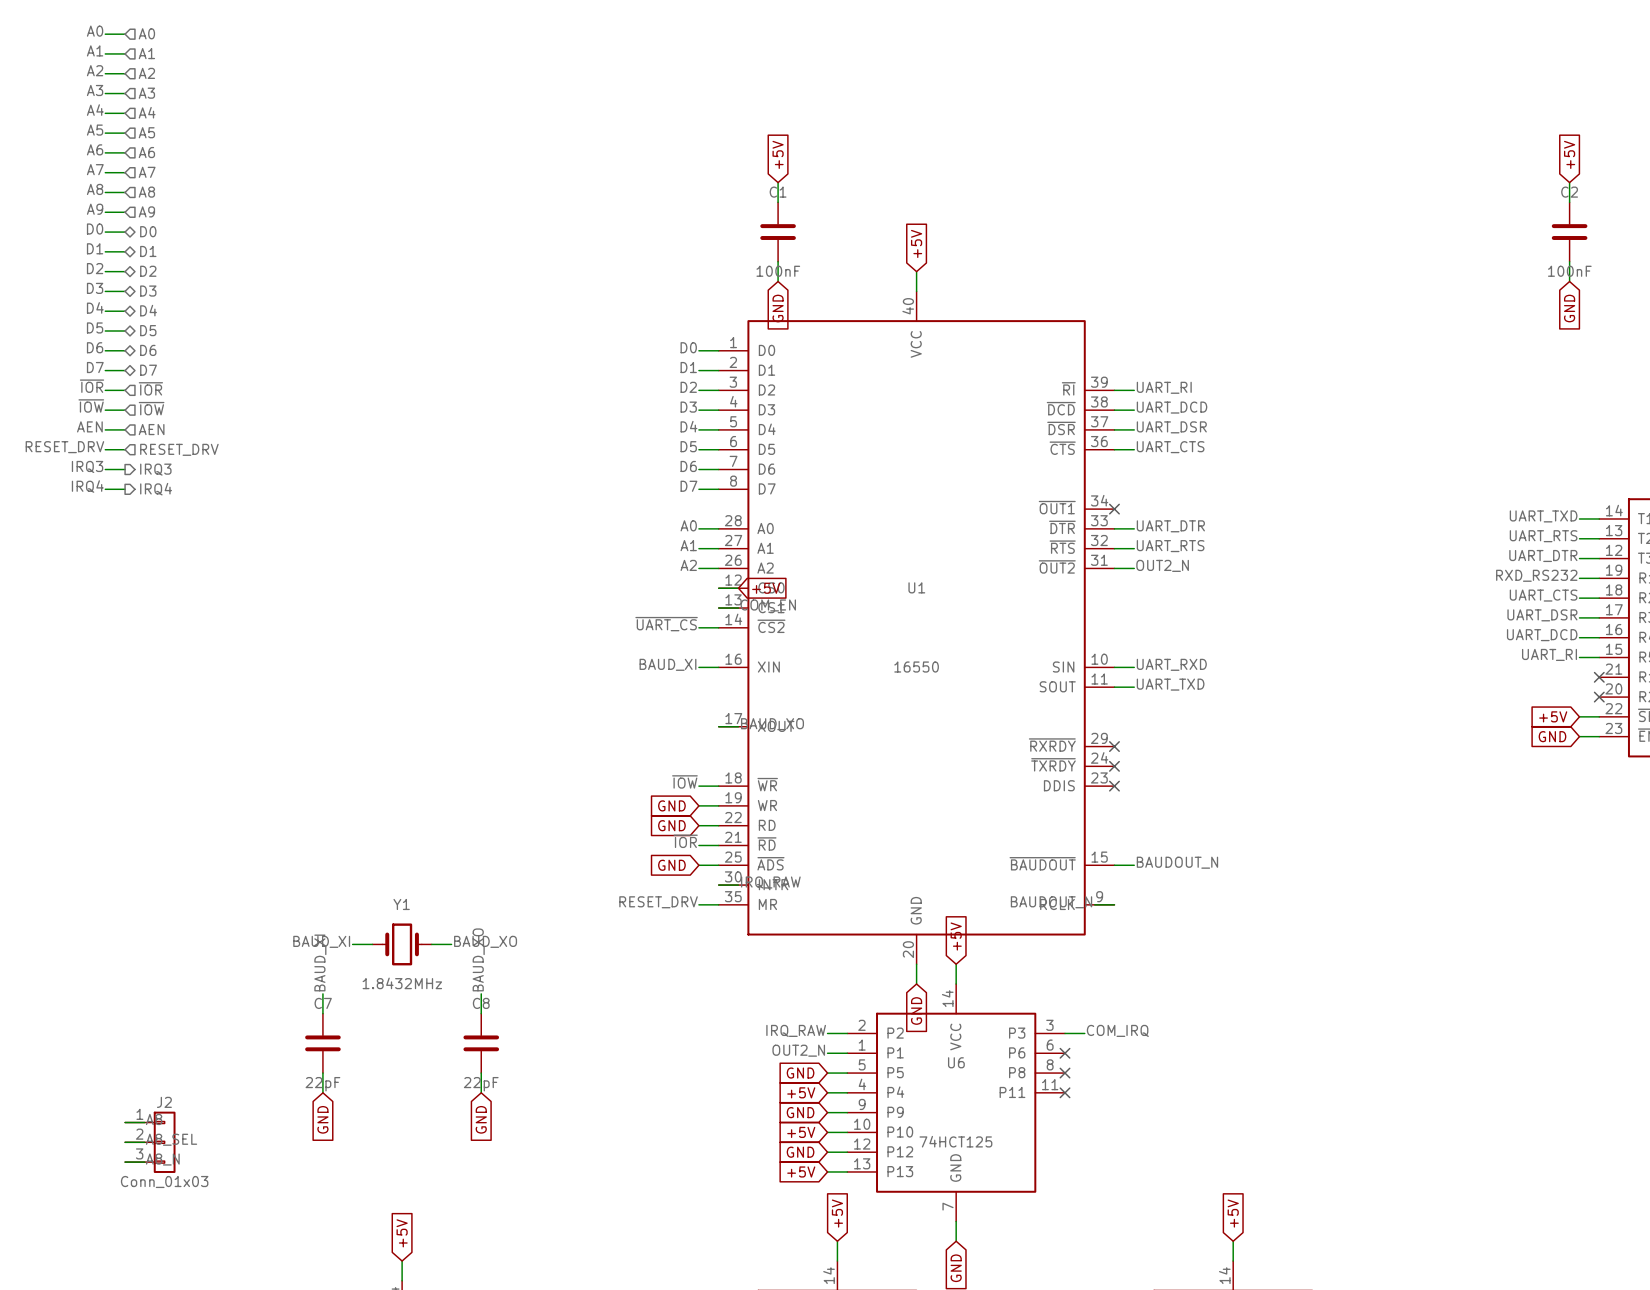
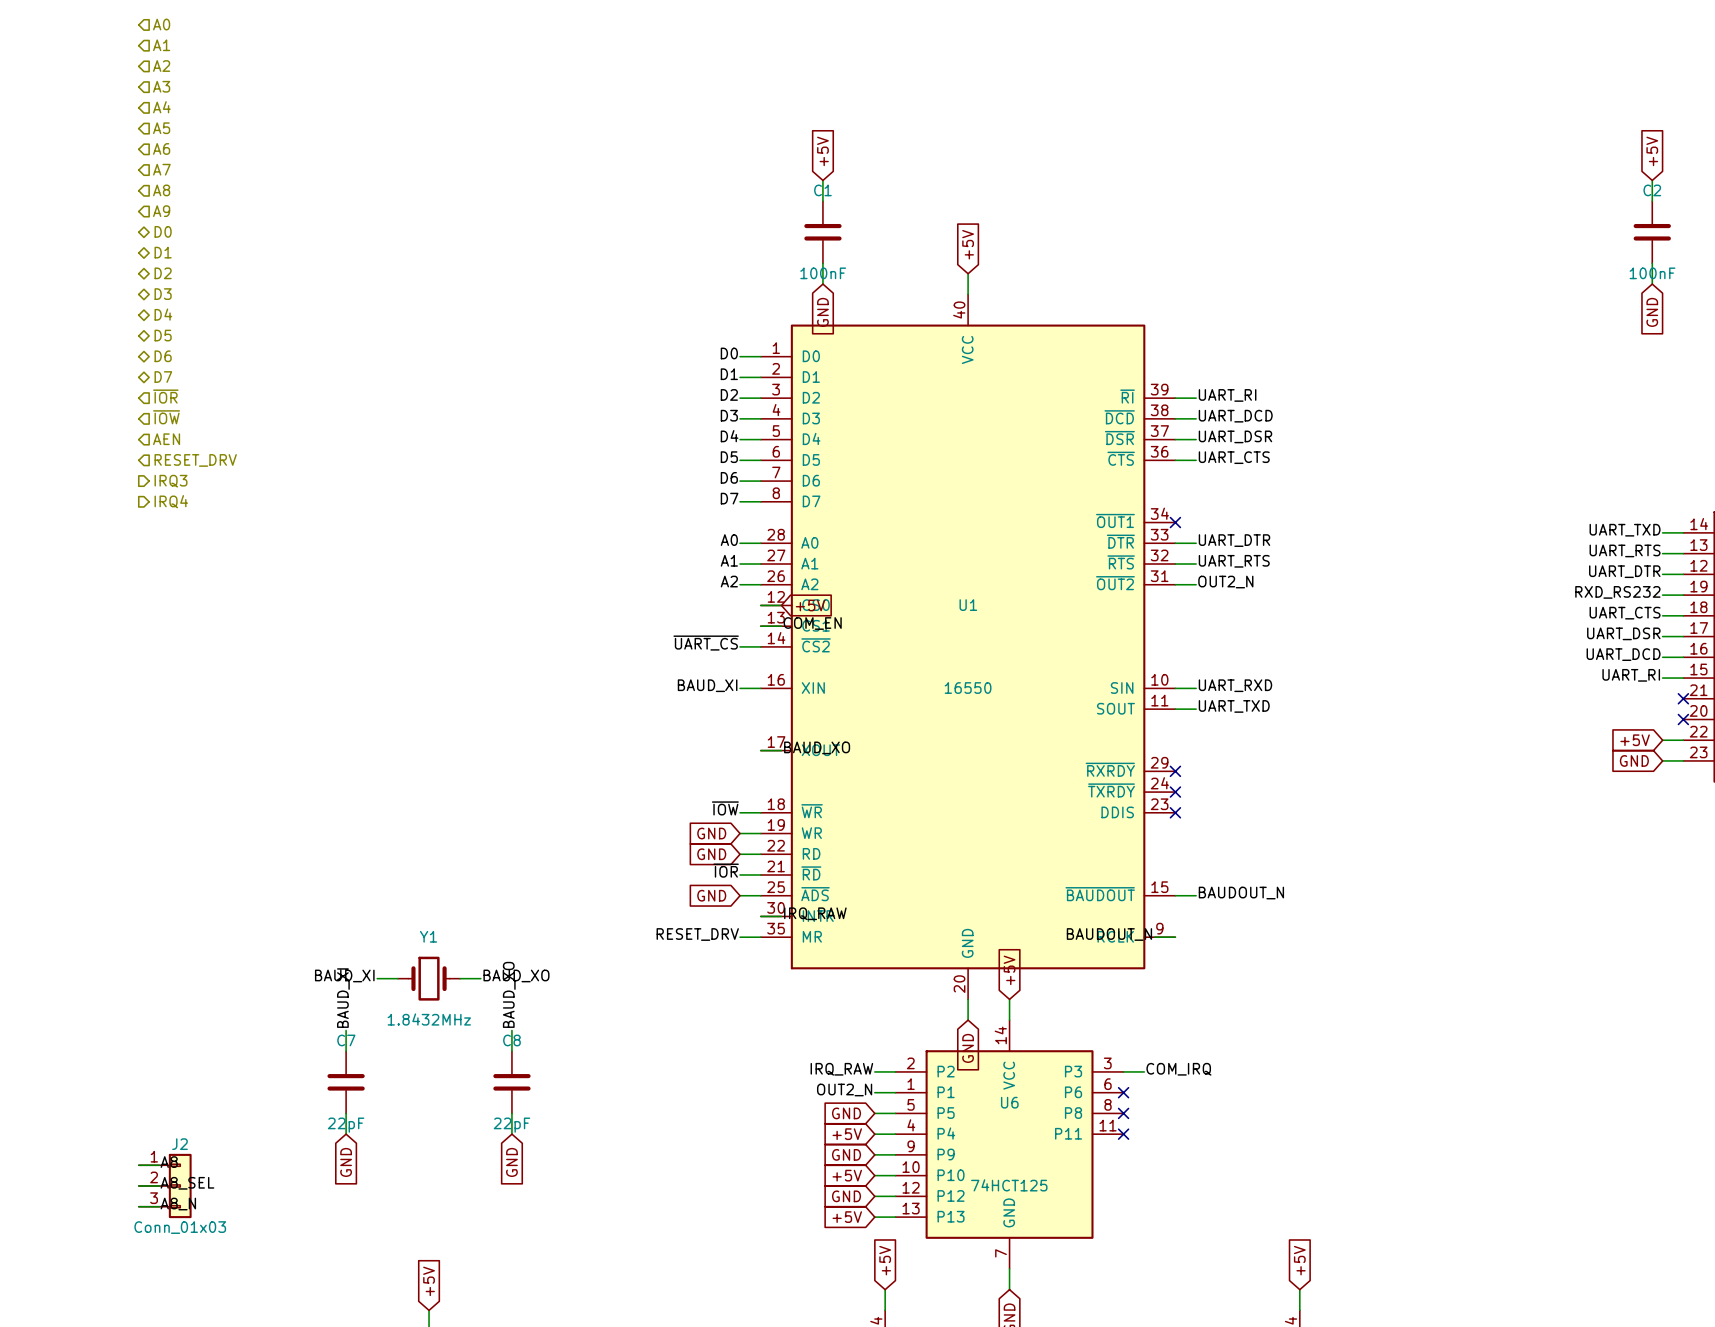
label: A0 (95, 31) -> none
wire: (105, 34) (125, 34) -> none
label: A1 (95, 50) -> none
wire: (105, 53) (125, 53) -> none
label: A2 (95, 70) -> none
wire: (105, 73) (125, 73) -> none
label: A3 (95, 90) -> none
wire: (105, 93) (125, 93) -> none
label: A4 (95, 110) -> none
wire: (105, 113) (125, 113) -> none
label: A5 (95, 130) -> none
wire: (105, 133) (125, 133) -> none
label: A6 (95, 149) -> none
wire: (105, 152) (125, 152) -> none
label: A7 (95, 169) -> none
wire: (105, 172) (125, 172) -> none
label: A8 (95, 189) -> none
wire: (105, 192) (125, 192) -> none
label: A9 (95, 209) -> none
wire: (105, 212) (125, 212) -> none
label: D0 (95, 229) -> none
wire: (105, 232) (125, 232) -> none
label: D1 (95, 248) -> none
wire: (105, 251) (125, 251) -> none
label: D2 (95, 268) -> none
wire: (105, 271) (125, 271) -> none
label: D3 (95, 288) -> none
wire: (105, 291) (125, 291) -> none
label: D4 (95, 307) -> none
wire: (105, 311) (125, 311) -> none
label: D5 (95, 327) -> none
wire: (105, 331) (125, 331) -> none
label: D6 (95, 347) -> none
wire: (105, 350) (125, 350) -> none
label: D7 (95, 367) -> none
wire: (105, 370) (125, 370) -> none
label: ~{IOR} (92, 386) -> none
wire: (105, 390) (125, 390) -> none
label: ~{IOW} (91, 405) -> none
wire: (105, 410) (125, 410) -> none
label: AEN (89, 426) -> none
wire: (105, 429) (125, 429) -> none
label: RESET_DRV (64, 447) -> none
wire: (105, 449) (125, 449) -> none
label: IRQ3 (87, 466) -> none
wire: (105, 469) (125, 469) -> none
label: IRQ4 (87, 486) -> none
wire: (105, 489) (125, 489) -> none

